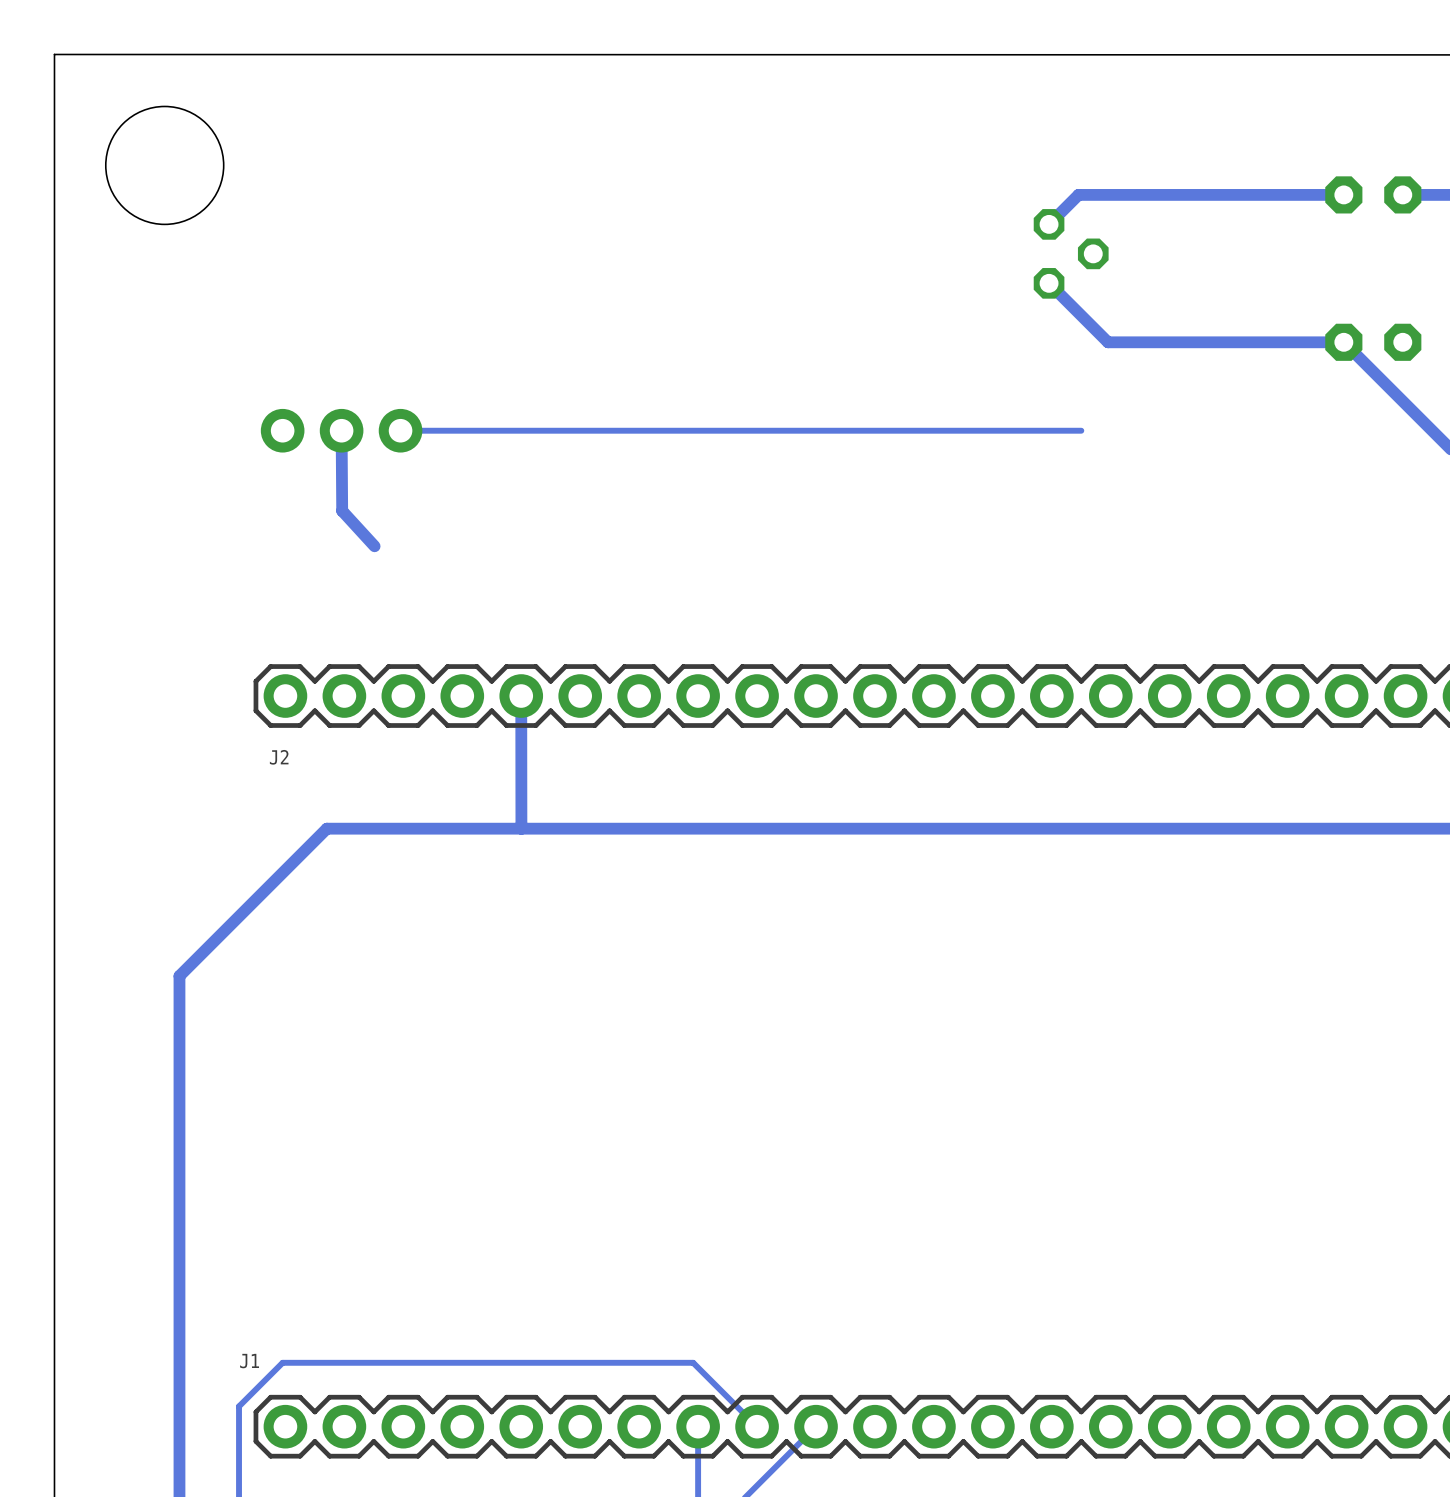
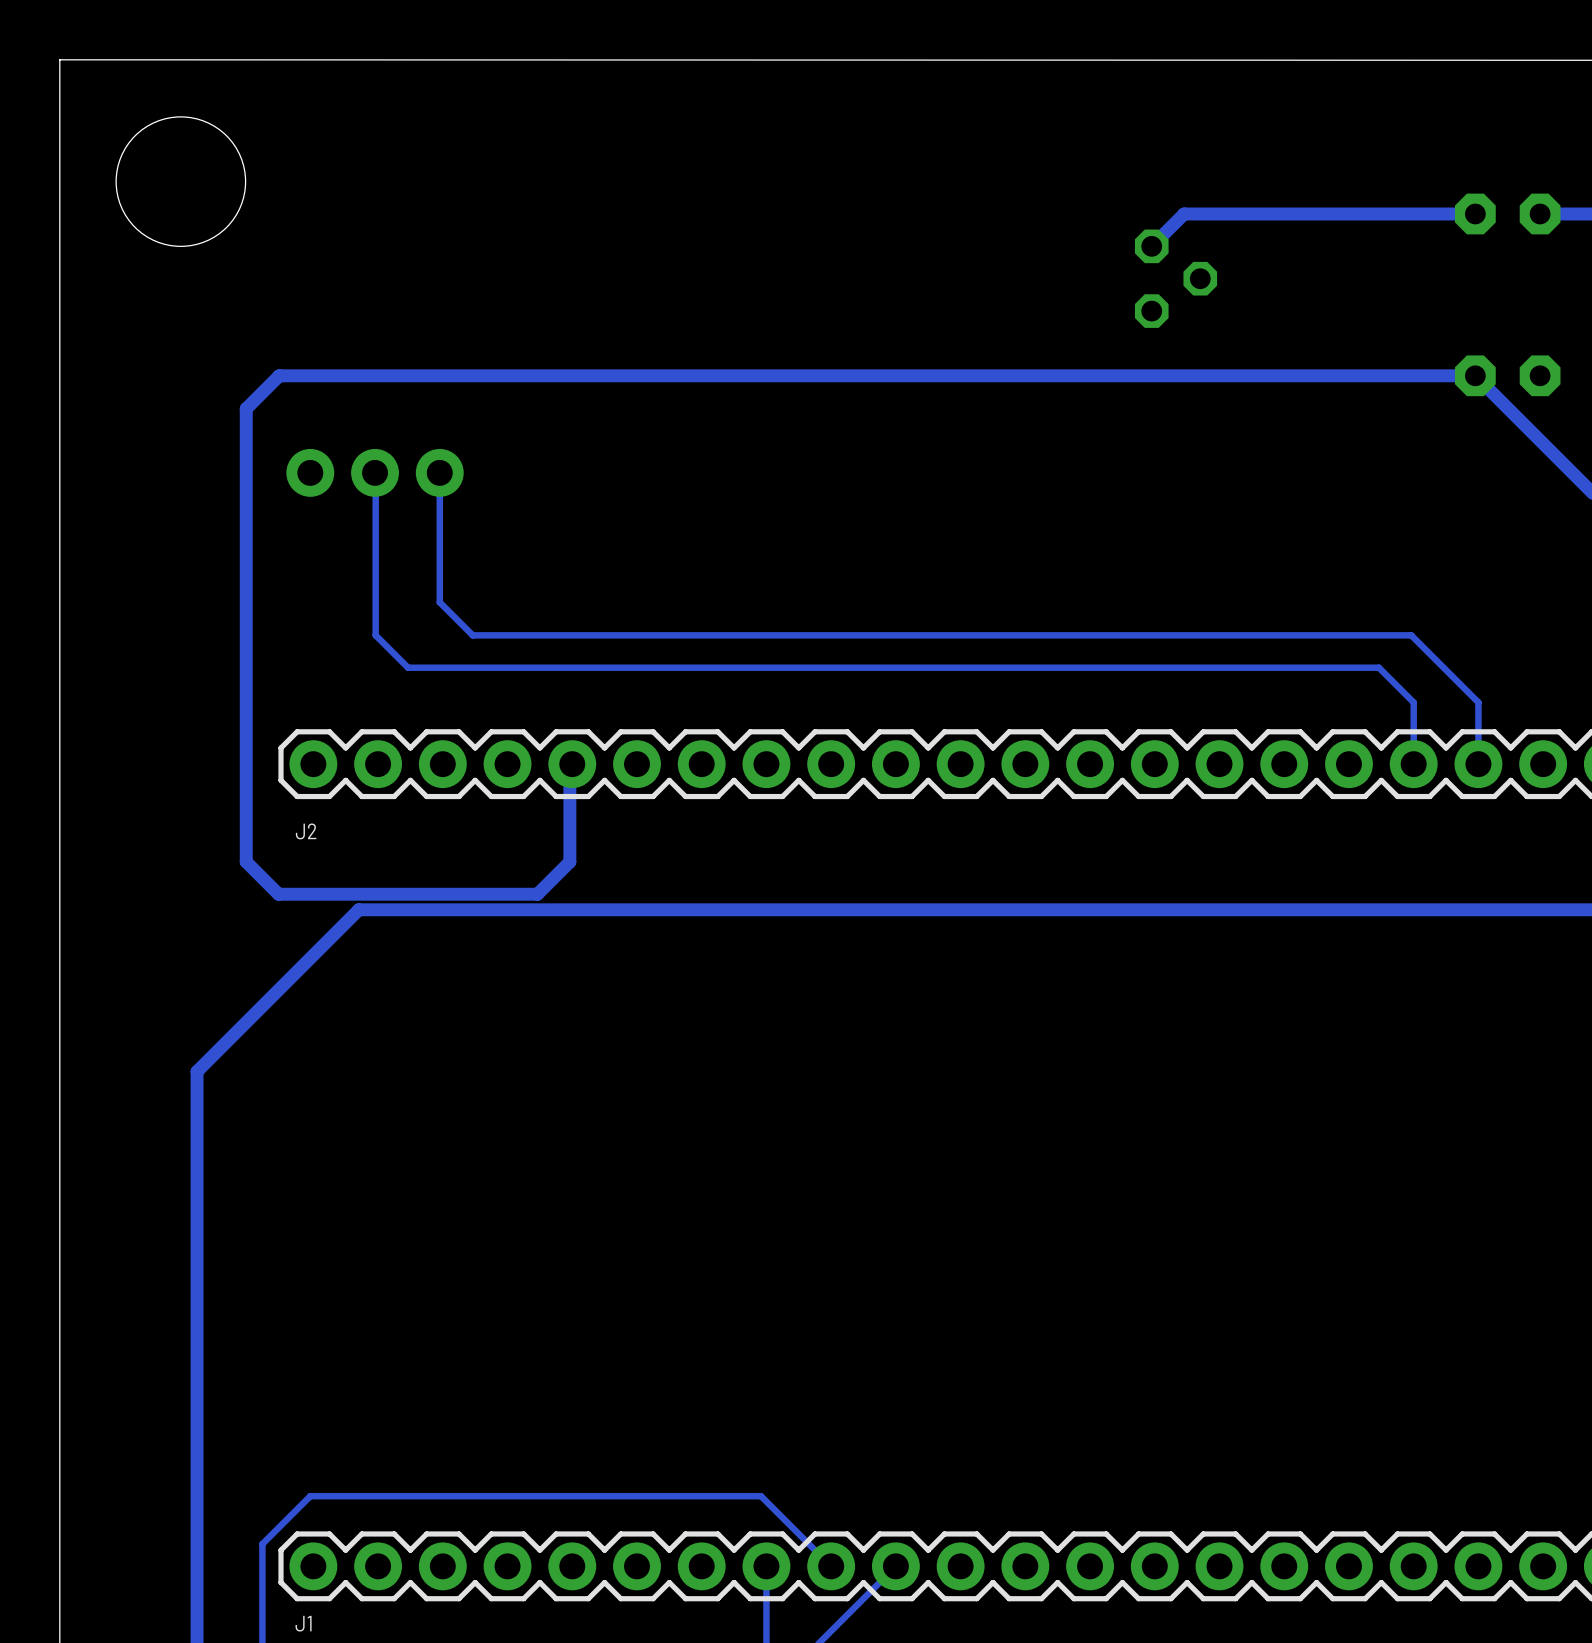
bottom track: (1049, 283) (1108, 342) -> (572, 764) (569, 766) (569, 861) (537, 894) (278, 894) (246, 861) (246, 408) (279, 375) (1216, 375)
bottom track: (341, 430) (342, 510) (374, 546) -> (375, 472) (375, 635) (408, 667) (1378, 667) (1413, 702) (1413, 764)
bottom track: (1081, 430) (400, 430) -> (1478, 764) (1478, 702) (1411, 635) (472, 635) (439, 602) (439, 472)
bottom track: (521, 696) (521, 828) -> none
J1 name position: J1 (249, 1361) -> J1 (303, 1623)

